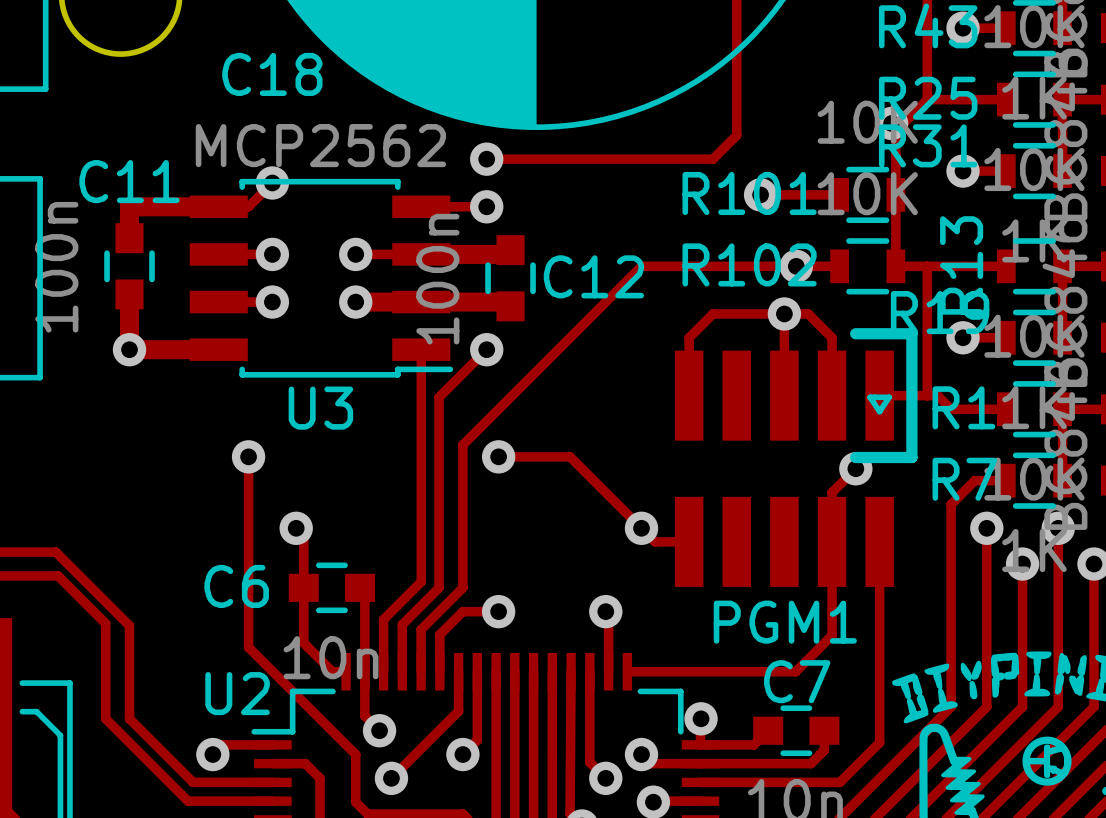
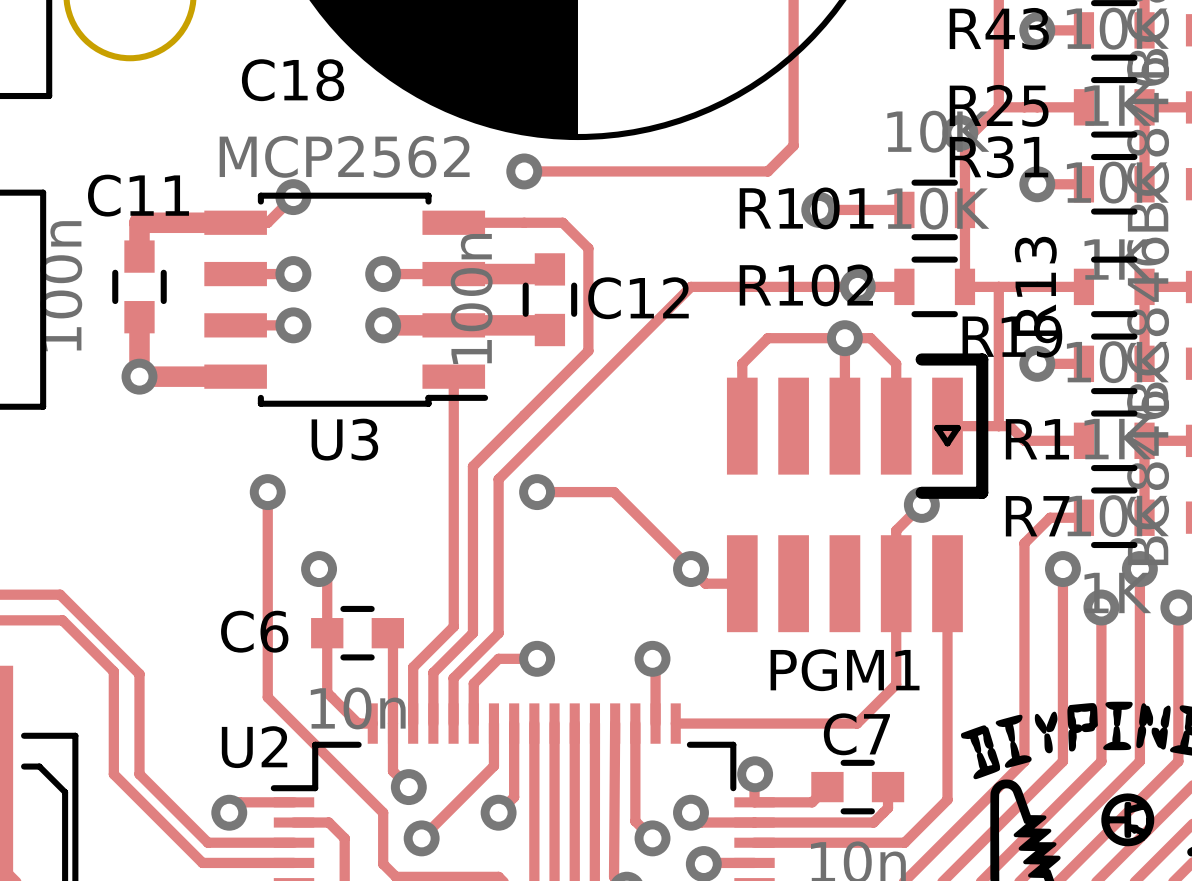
via: (486, 206) -> none
track: (486, 349) (439, 397) (439, 433) -> (524, 222) (562, 222) (588, 248) (588, 351) (472, 466)
via: (486, 349) -> none

